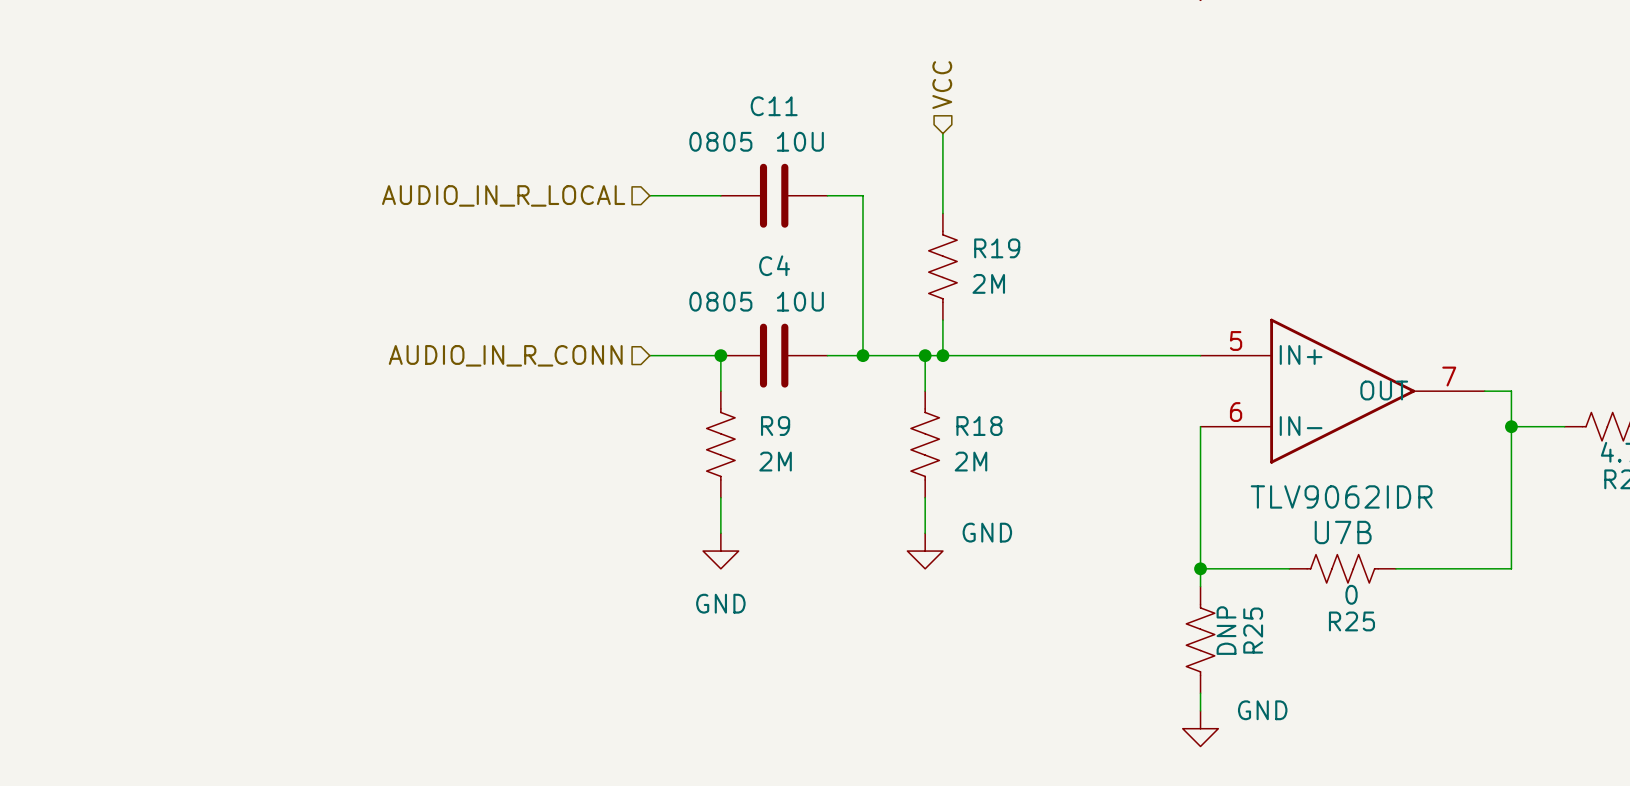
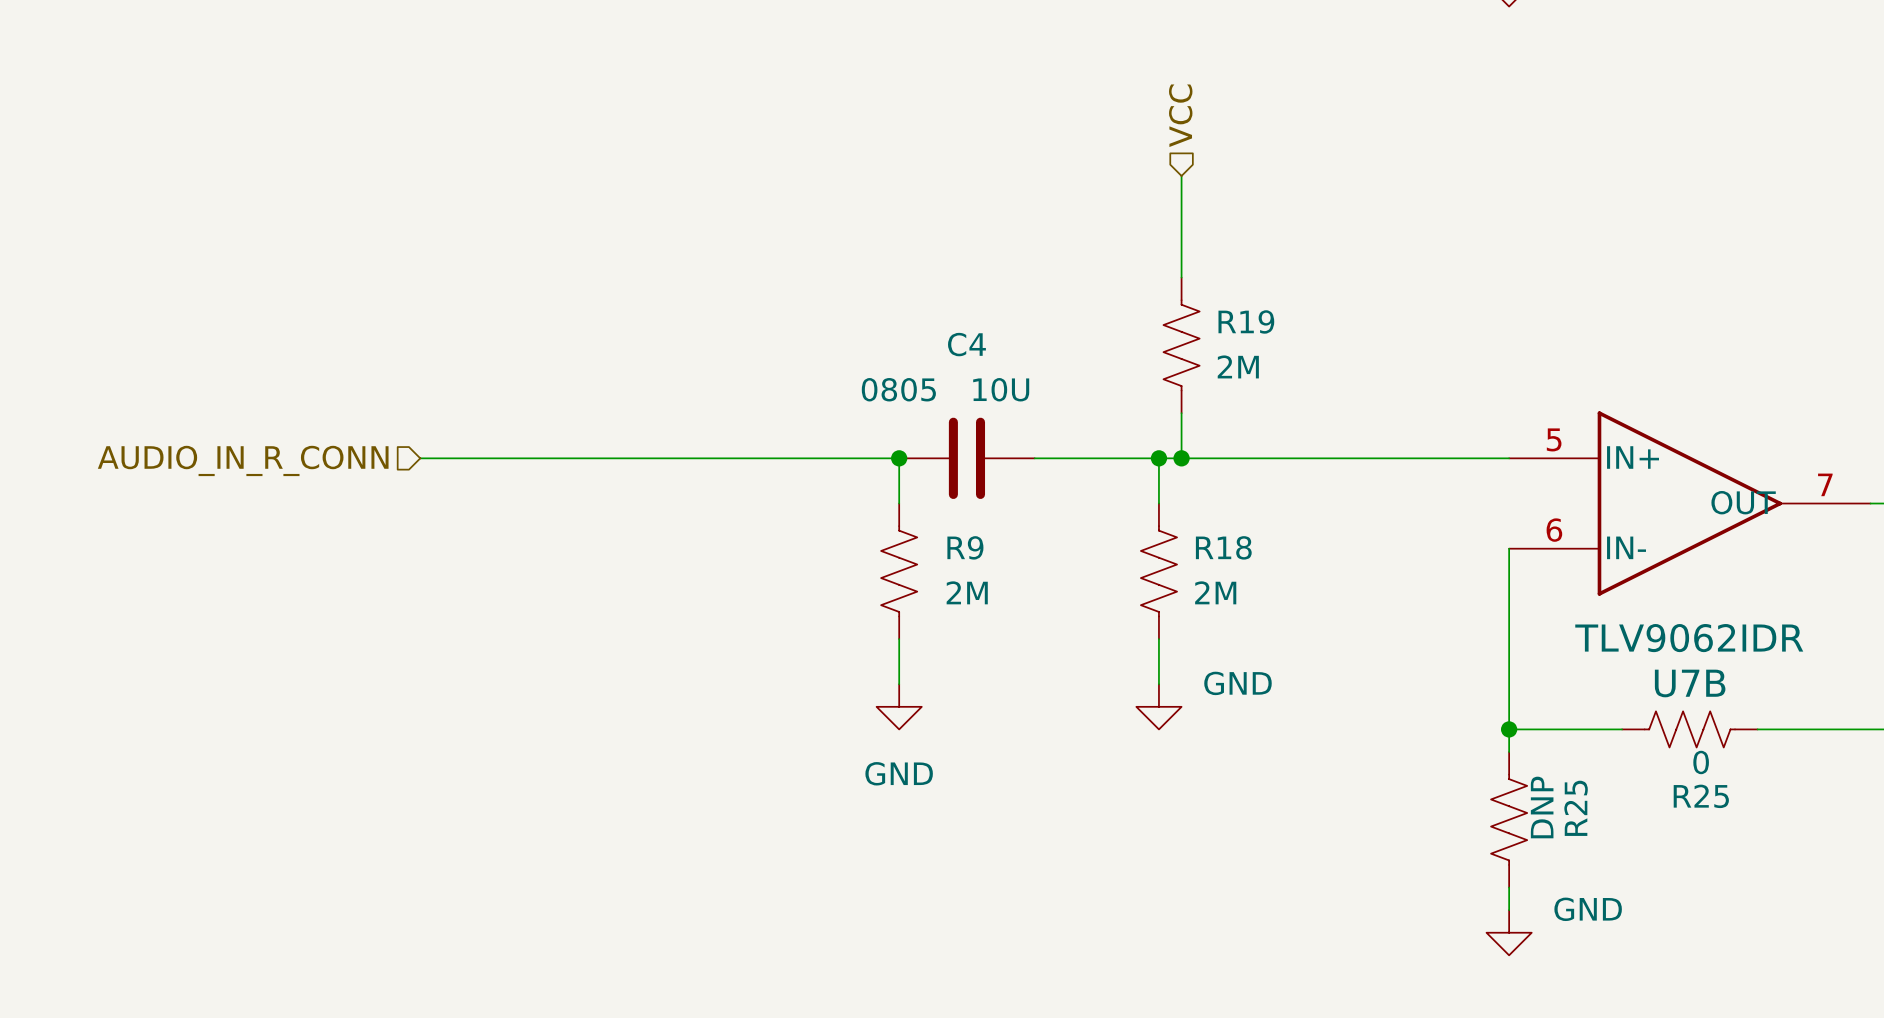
hierarchical label: AUDIO_IN_R_LOCAL (503, 195) -> none
wire: (649, 195) (720, 195) -> none
C11: 10U (774, 195) -> none
wire: (827, 195) (862, 195) (862, 355) -> none
wire: none -> (420, 458) (808, 458)
hierarchical label position: AUDIO_IN_R_CONN (505, 355) -> AUDIO_IN_R_CONN (243, 460)
junction: (862, 355) -> none

